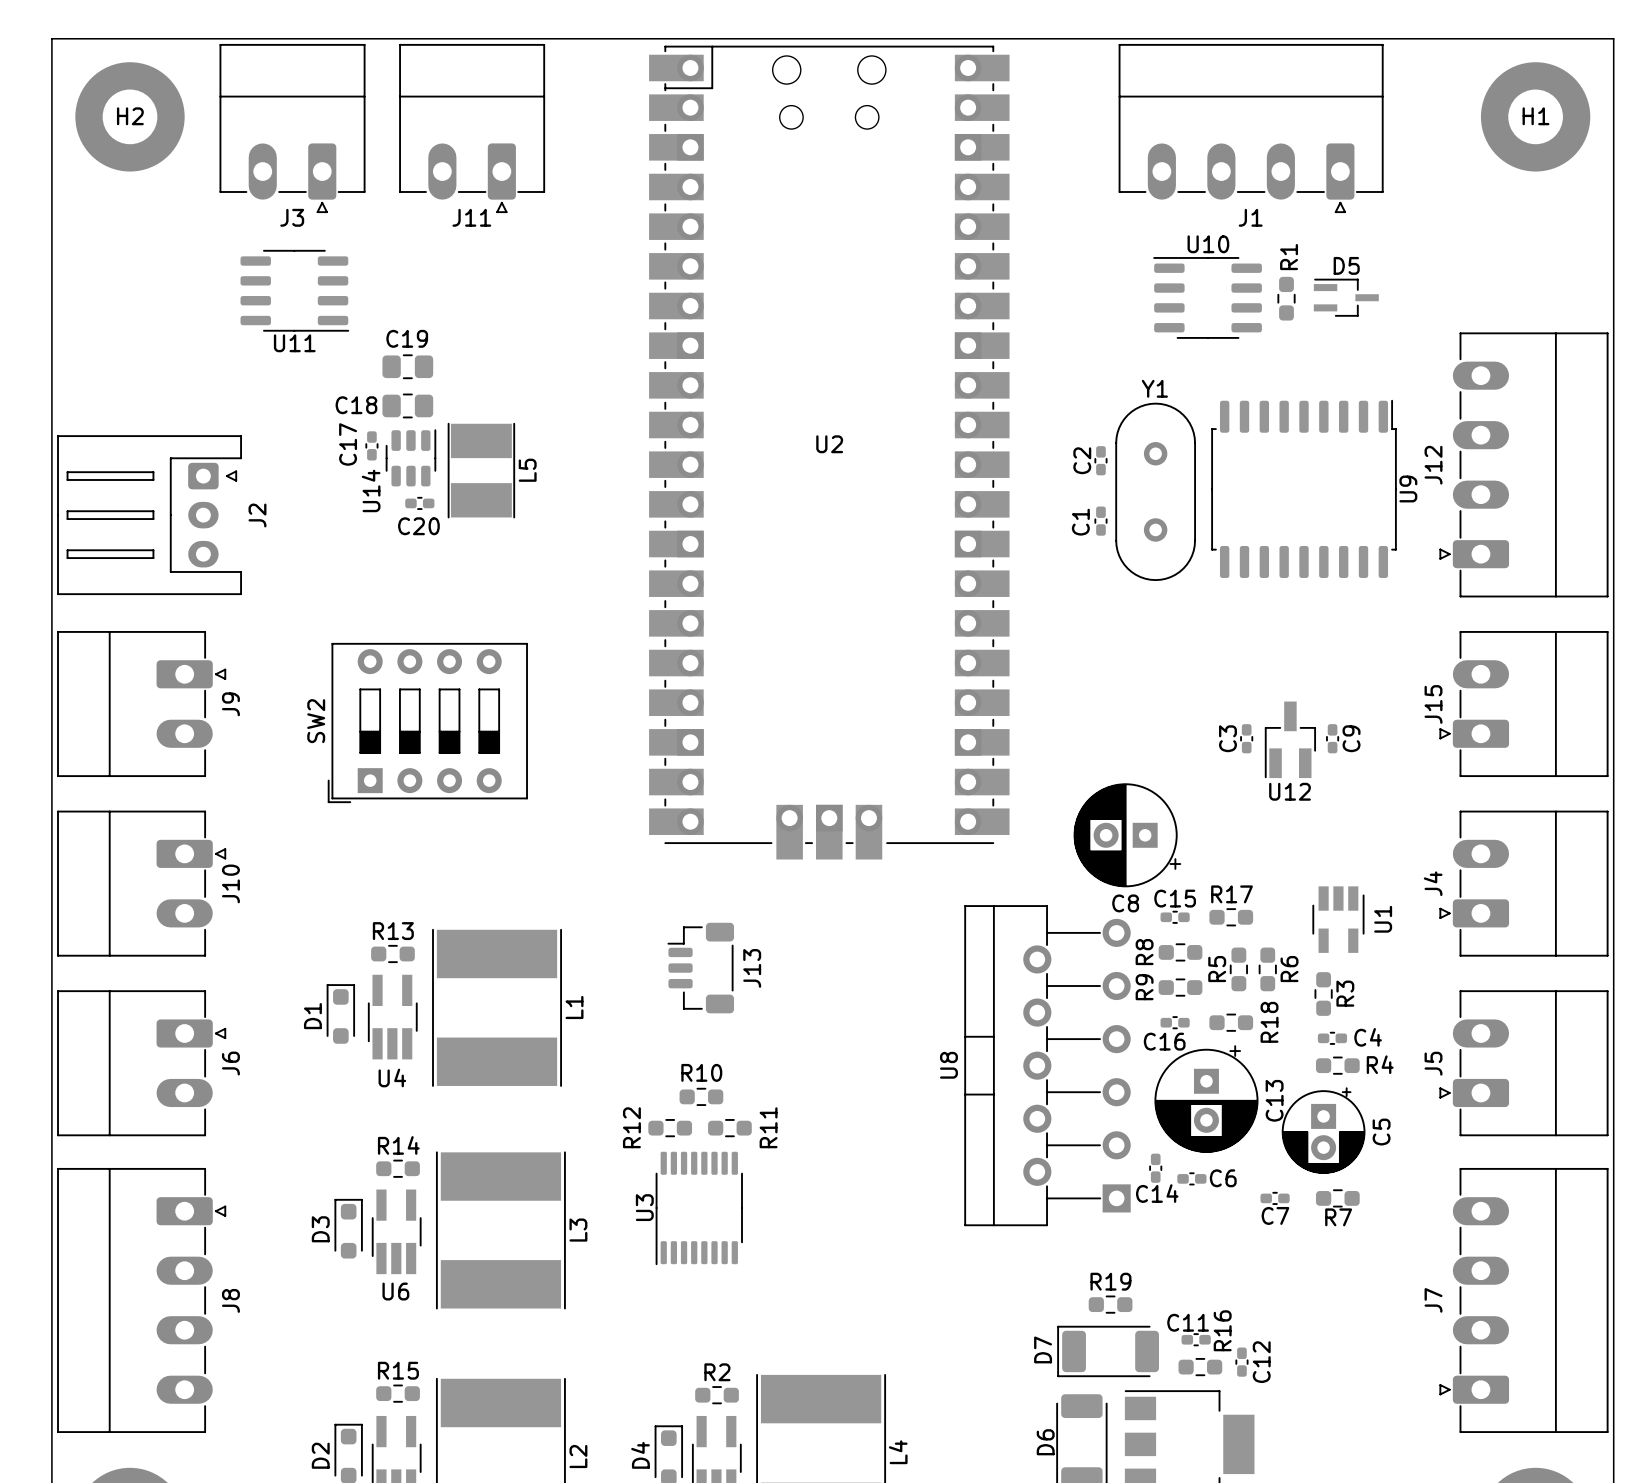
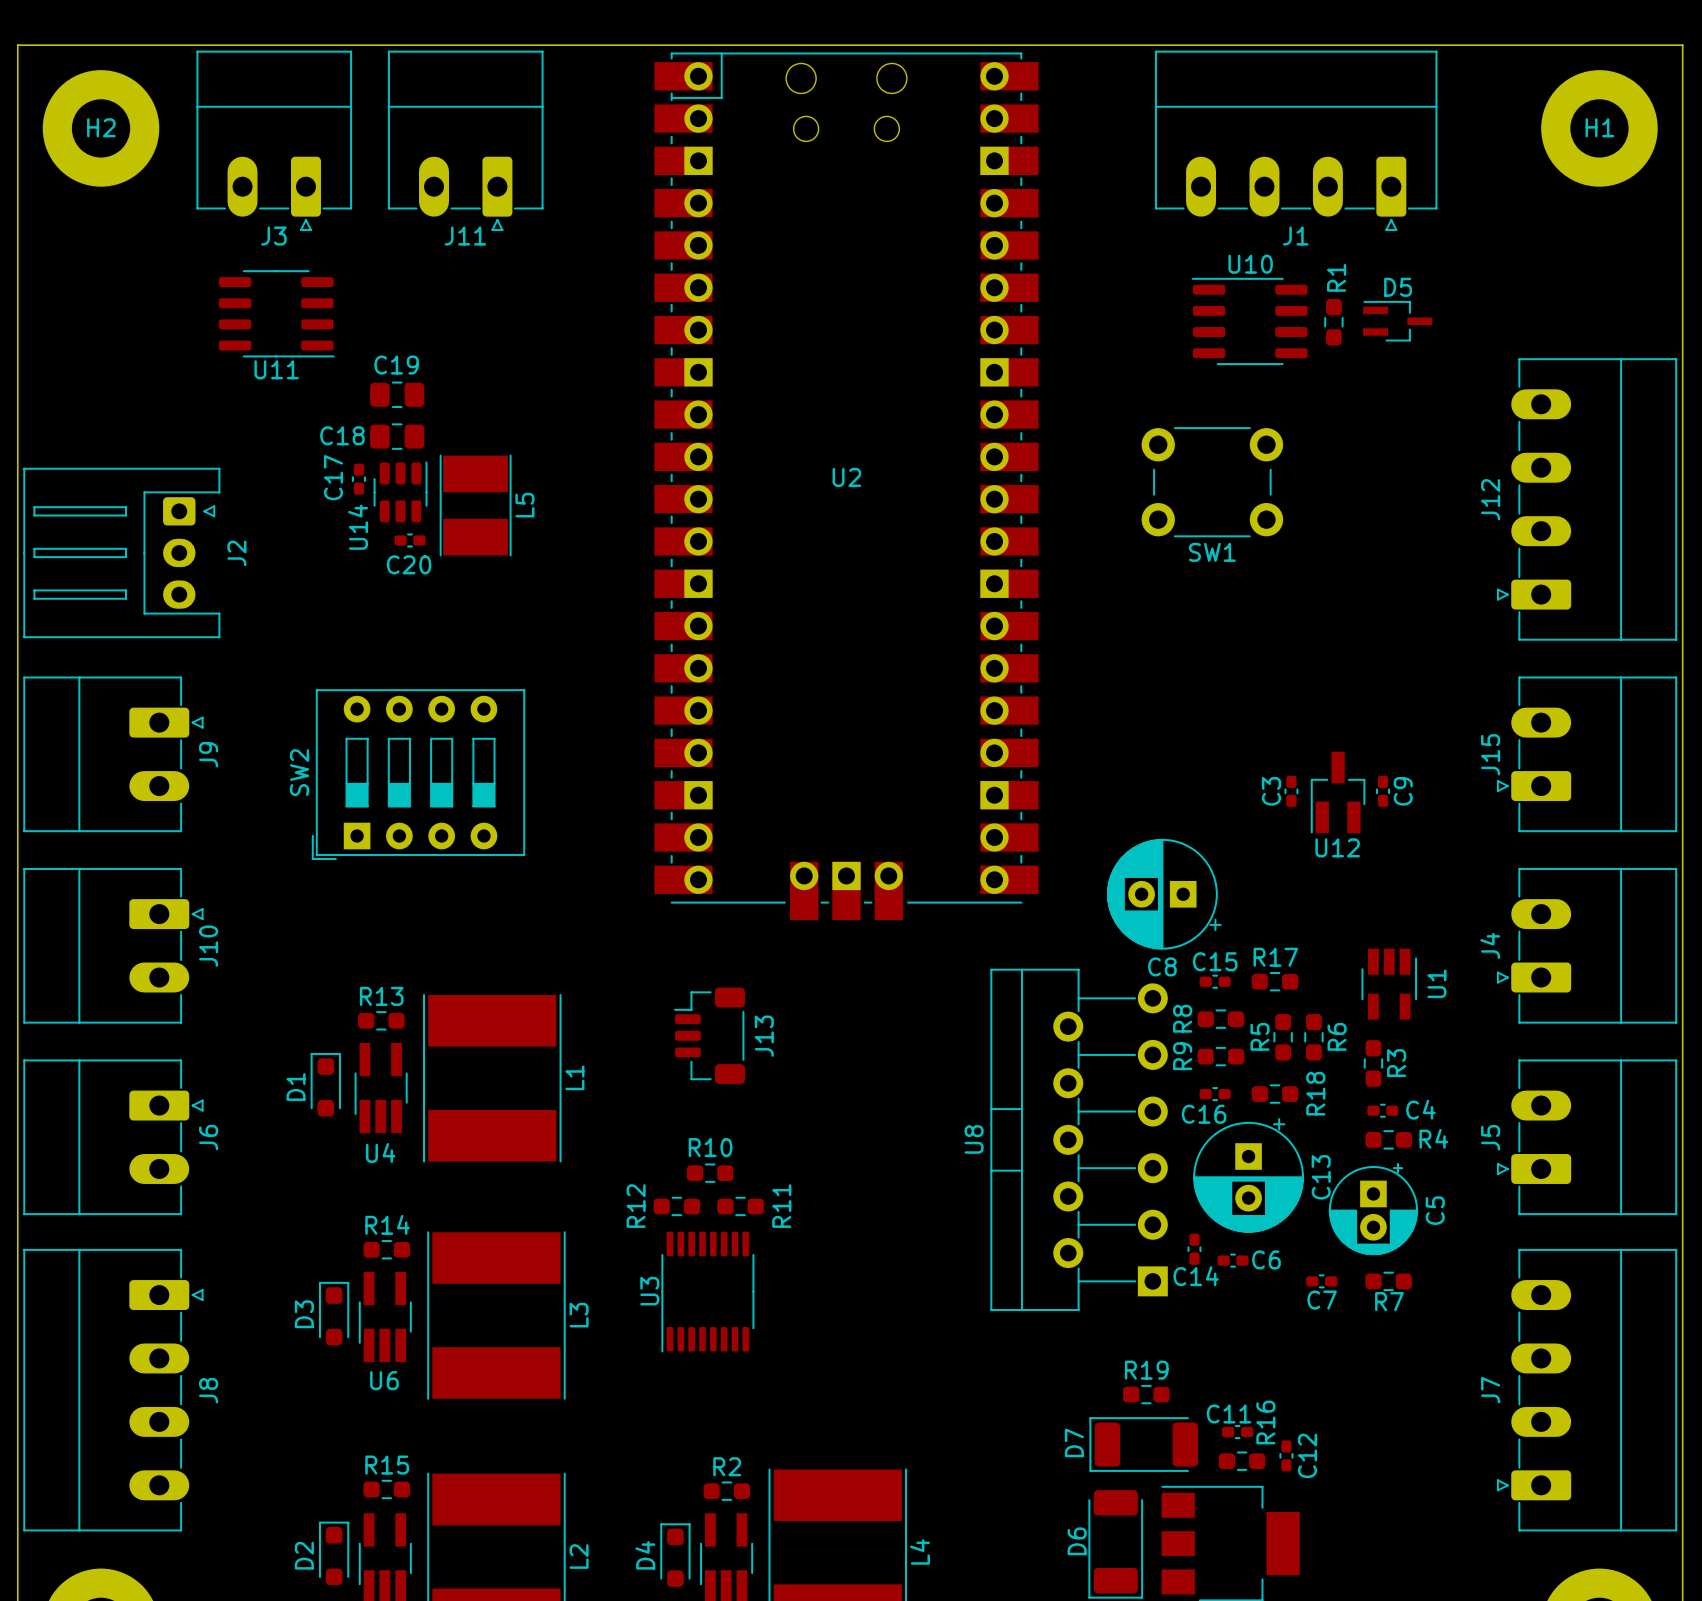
SW1: none -> (1212, 482)
C2: (1100, 460) -> none
U9: (1304, 488) -> none
Y1: (1155, 491) -> none
C1: (1100, 521) -> none

